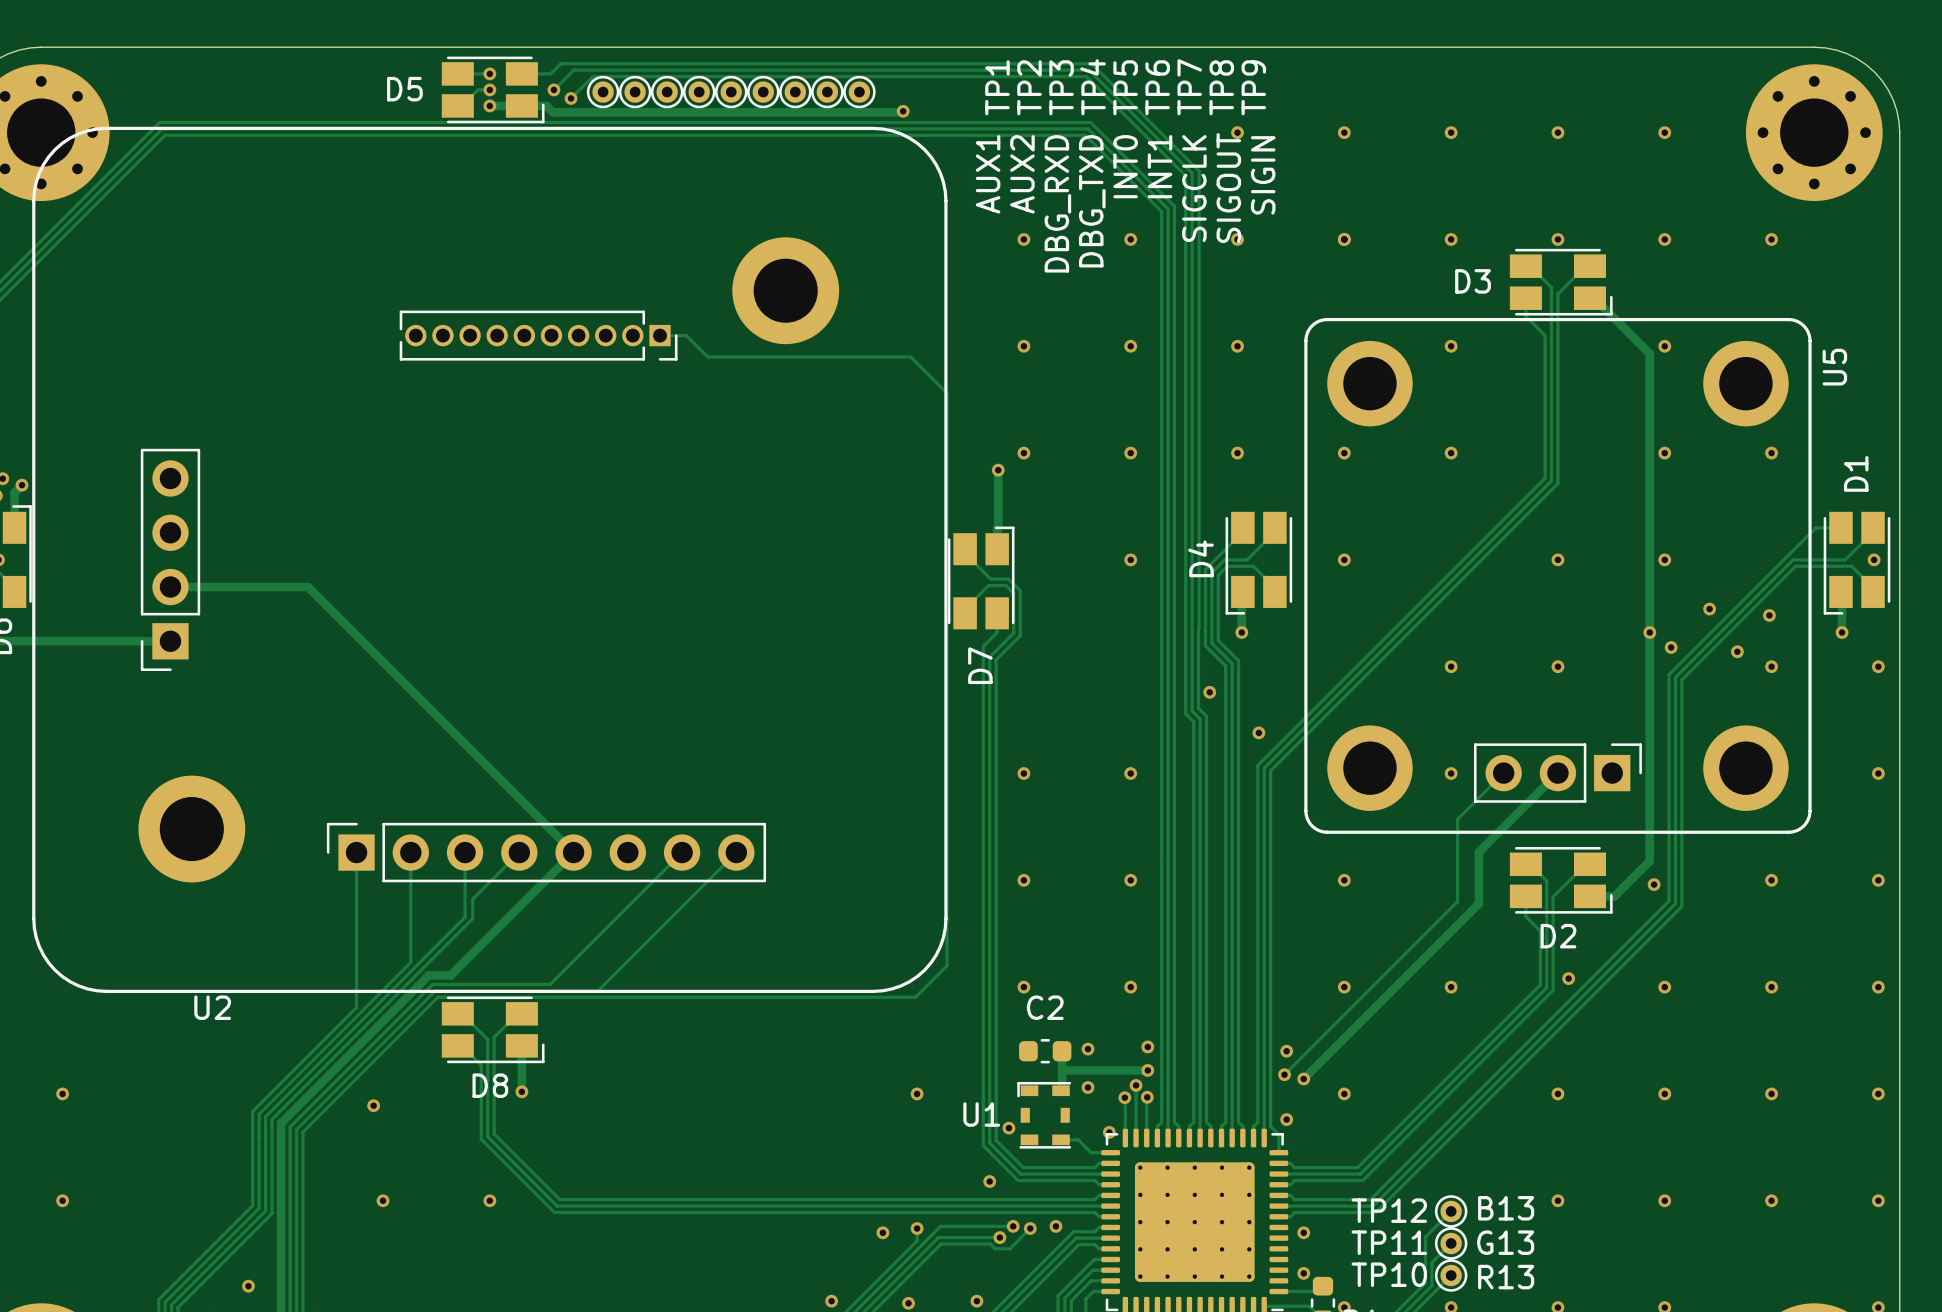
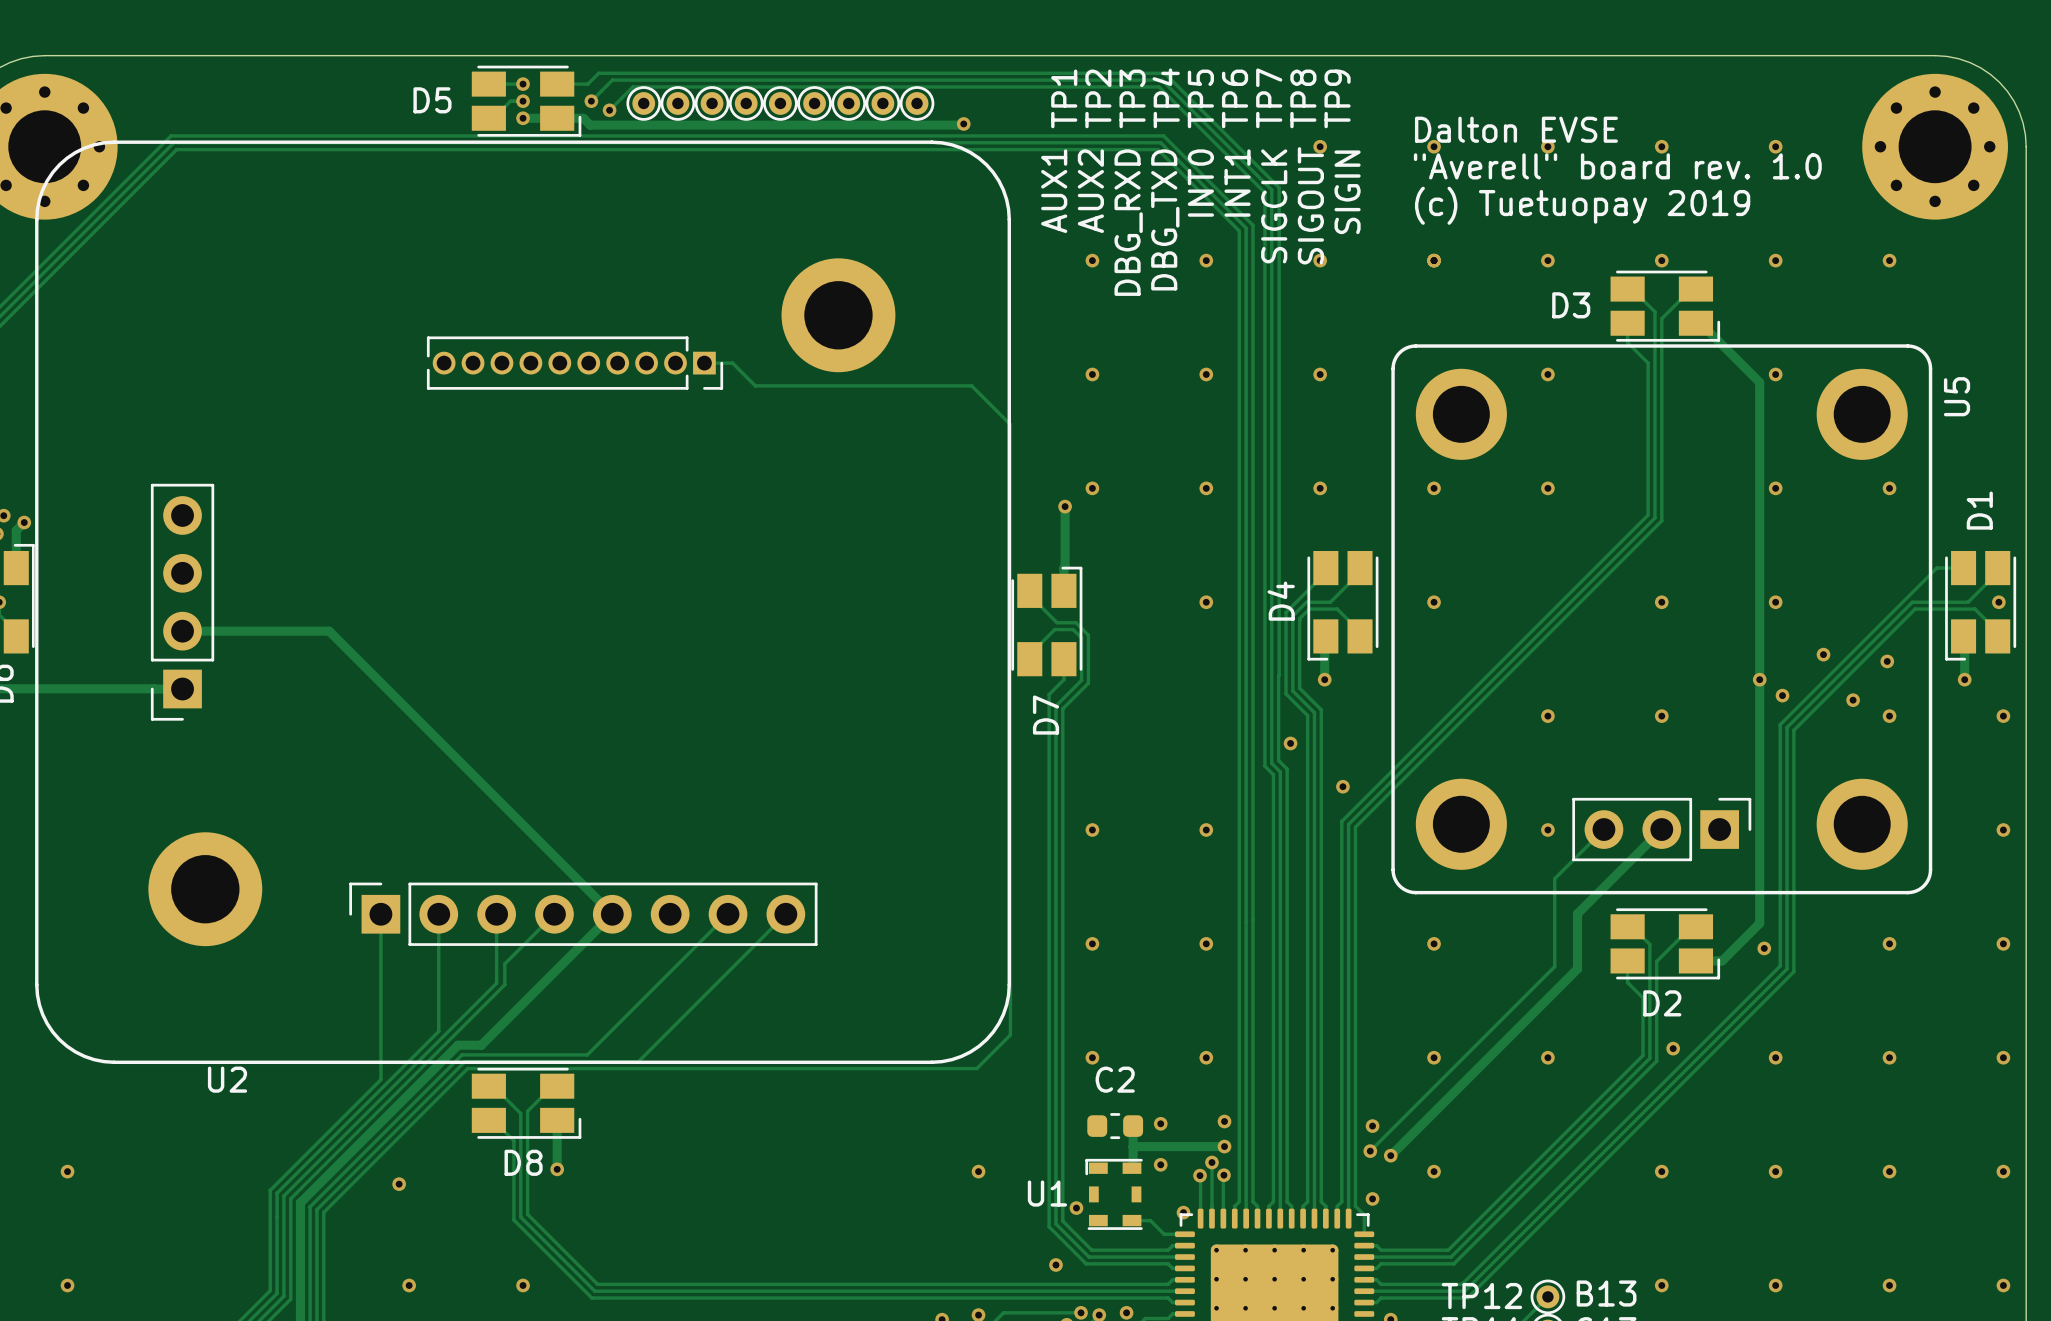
text: none -> Dalton EVSE (1516, 129)
text: none -> "Averell" board rev. 1.0 (1617, 166)
text: none -> (c) Tuetuopay 2019 (1582, 205)

